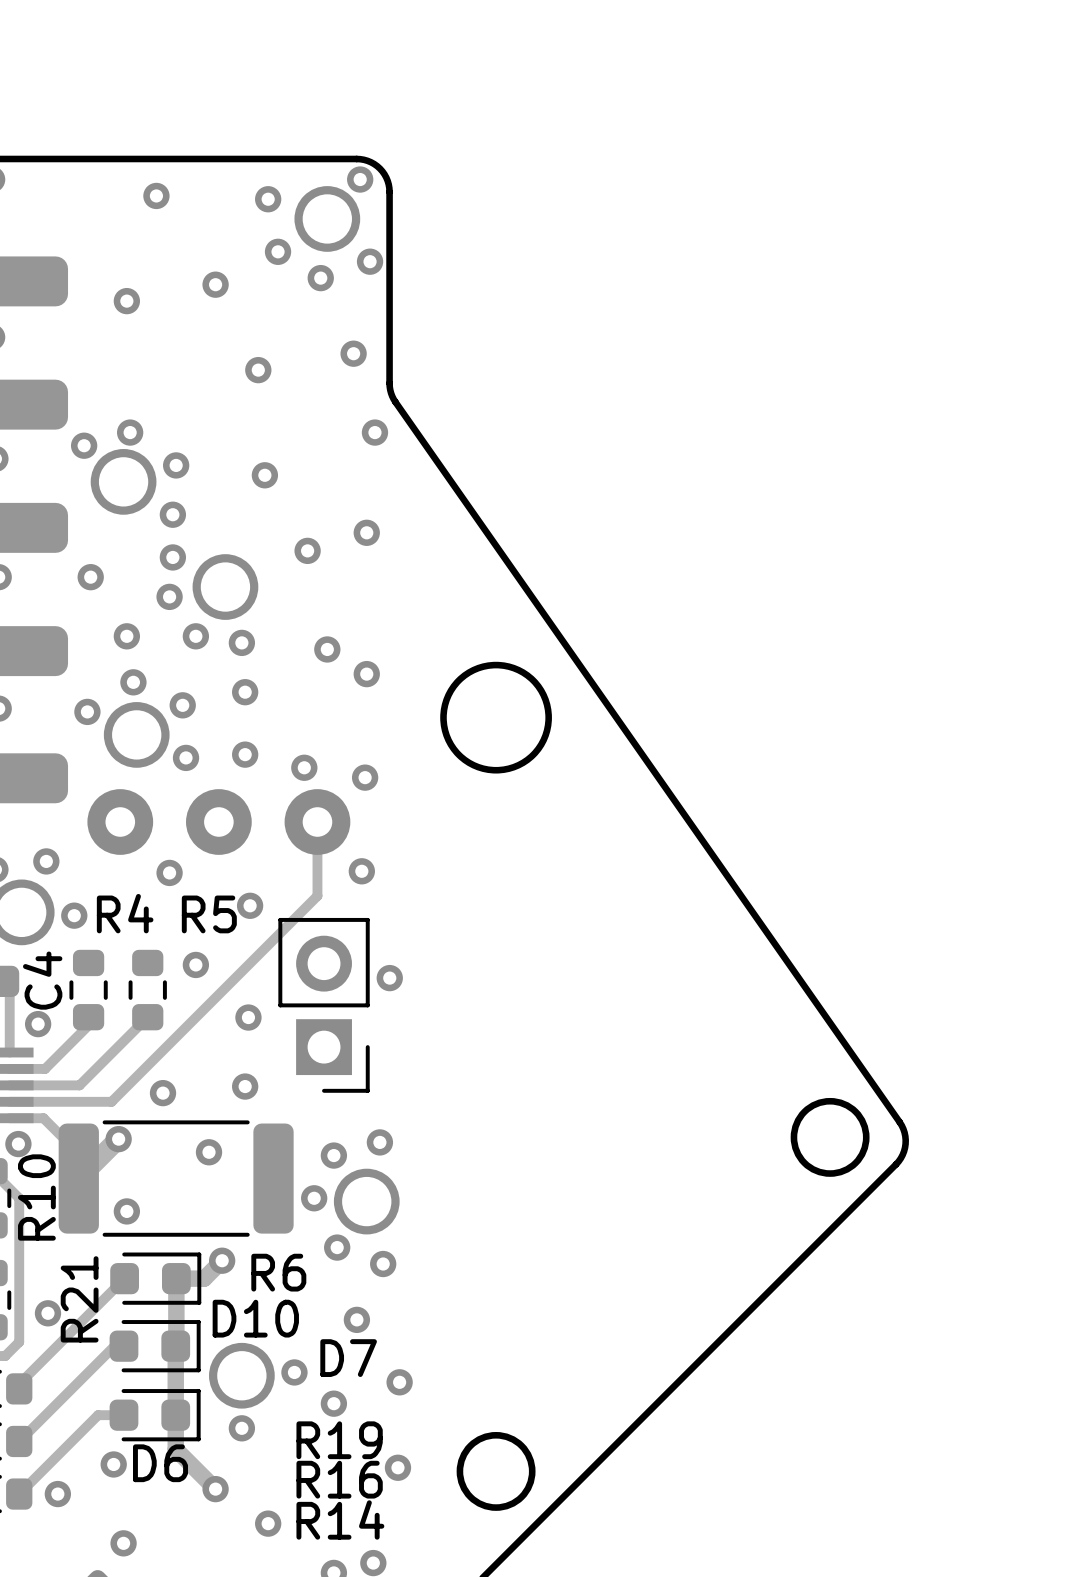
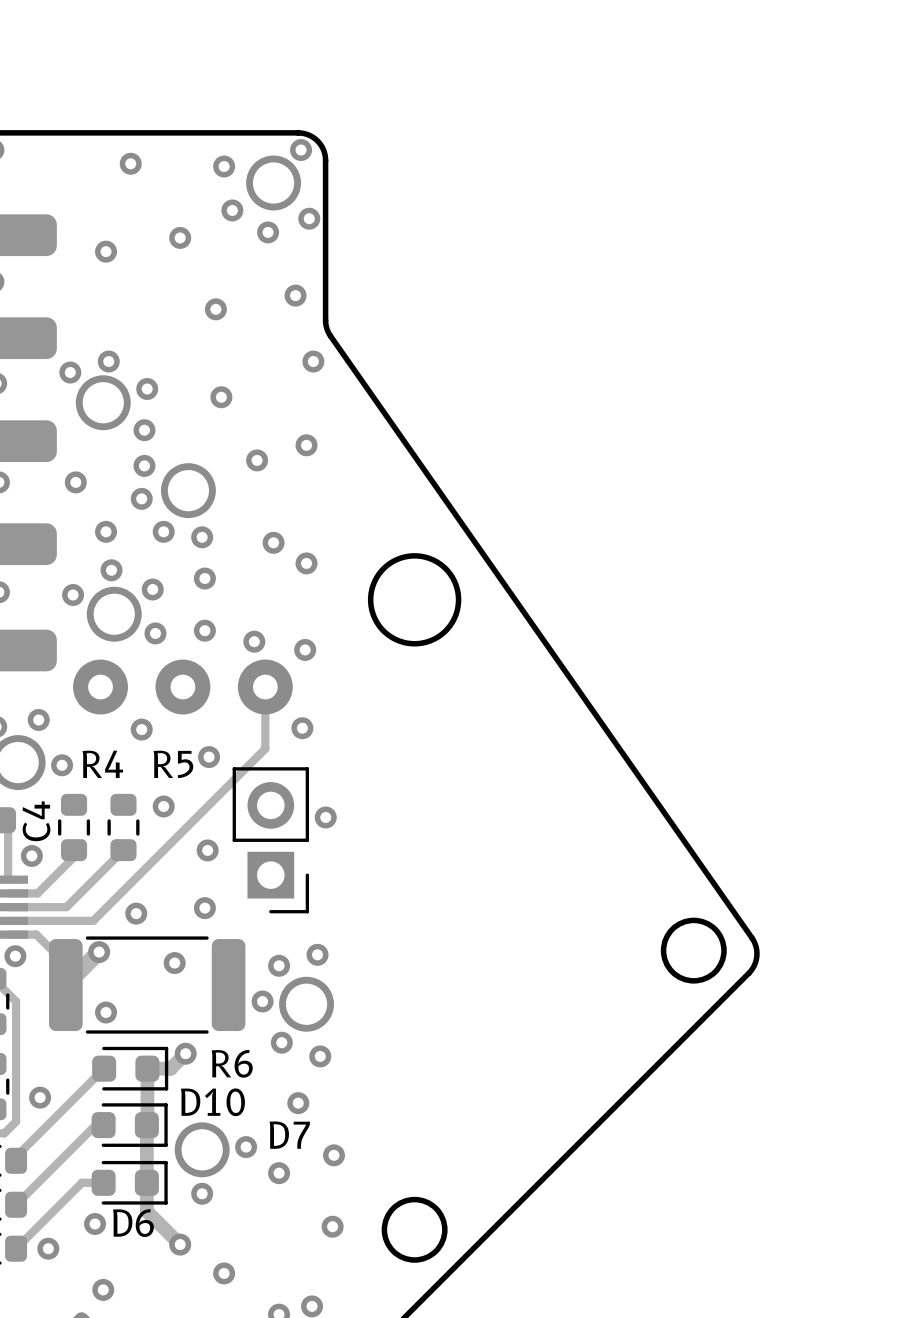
R10 name: R10 (36, 1197) -> none
R21 name: R21 (79, 1299) -> none
R19 name: R19 (339, 1440) -> none
R16 name: R16 (339, 1479) -> none
R14 name: R14 (340, 1519) -> none

